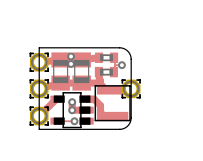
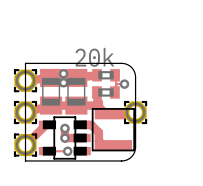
part value: none -> 20k (94, 57)

